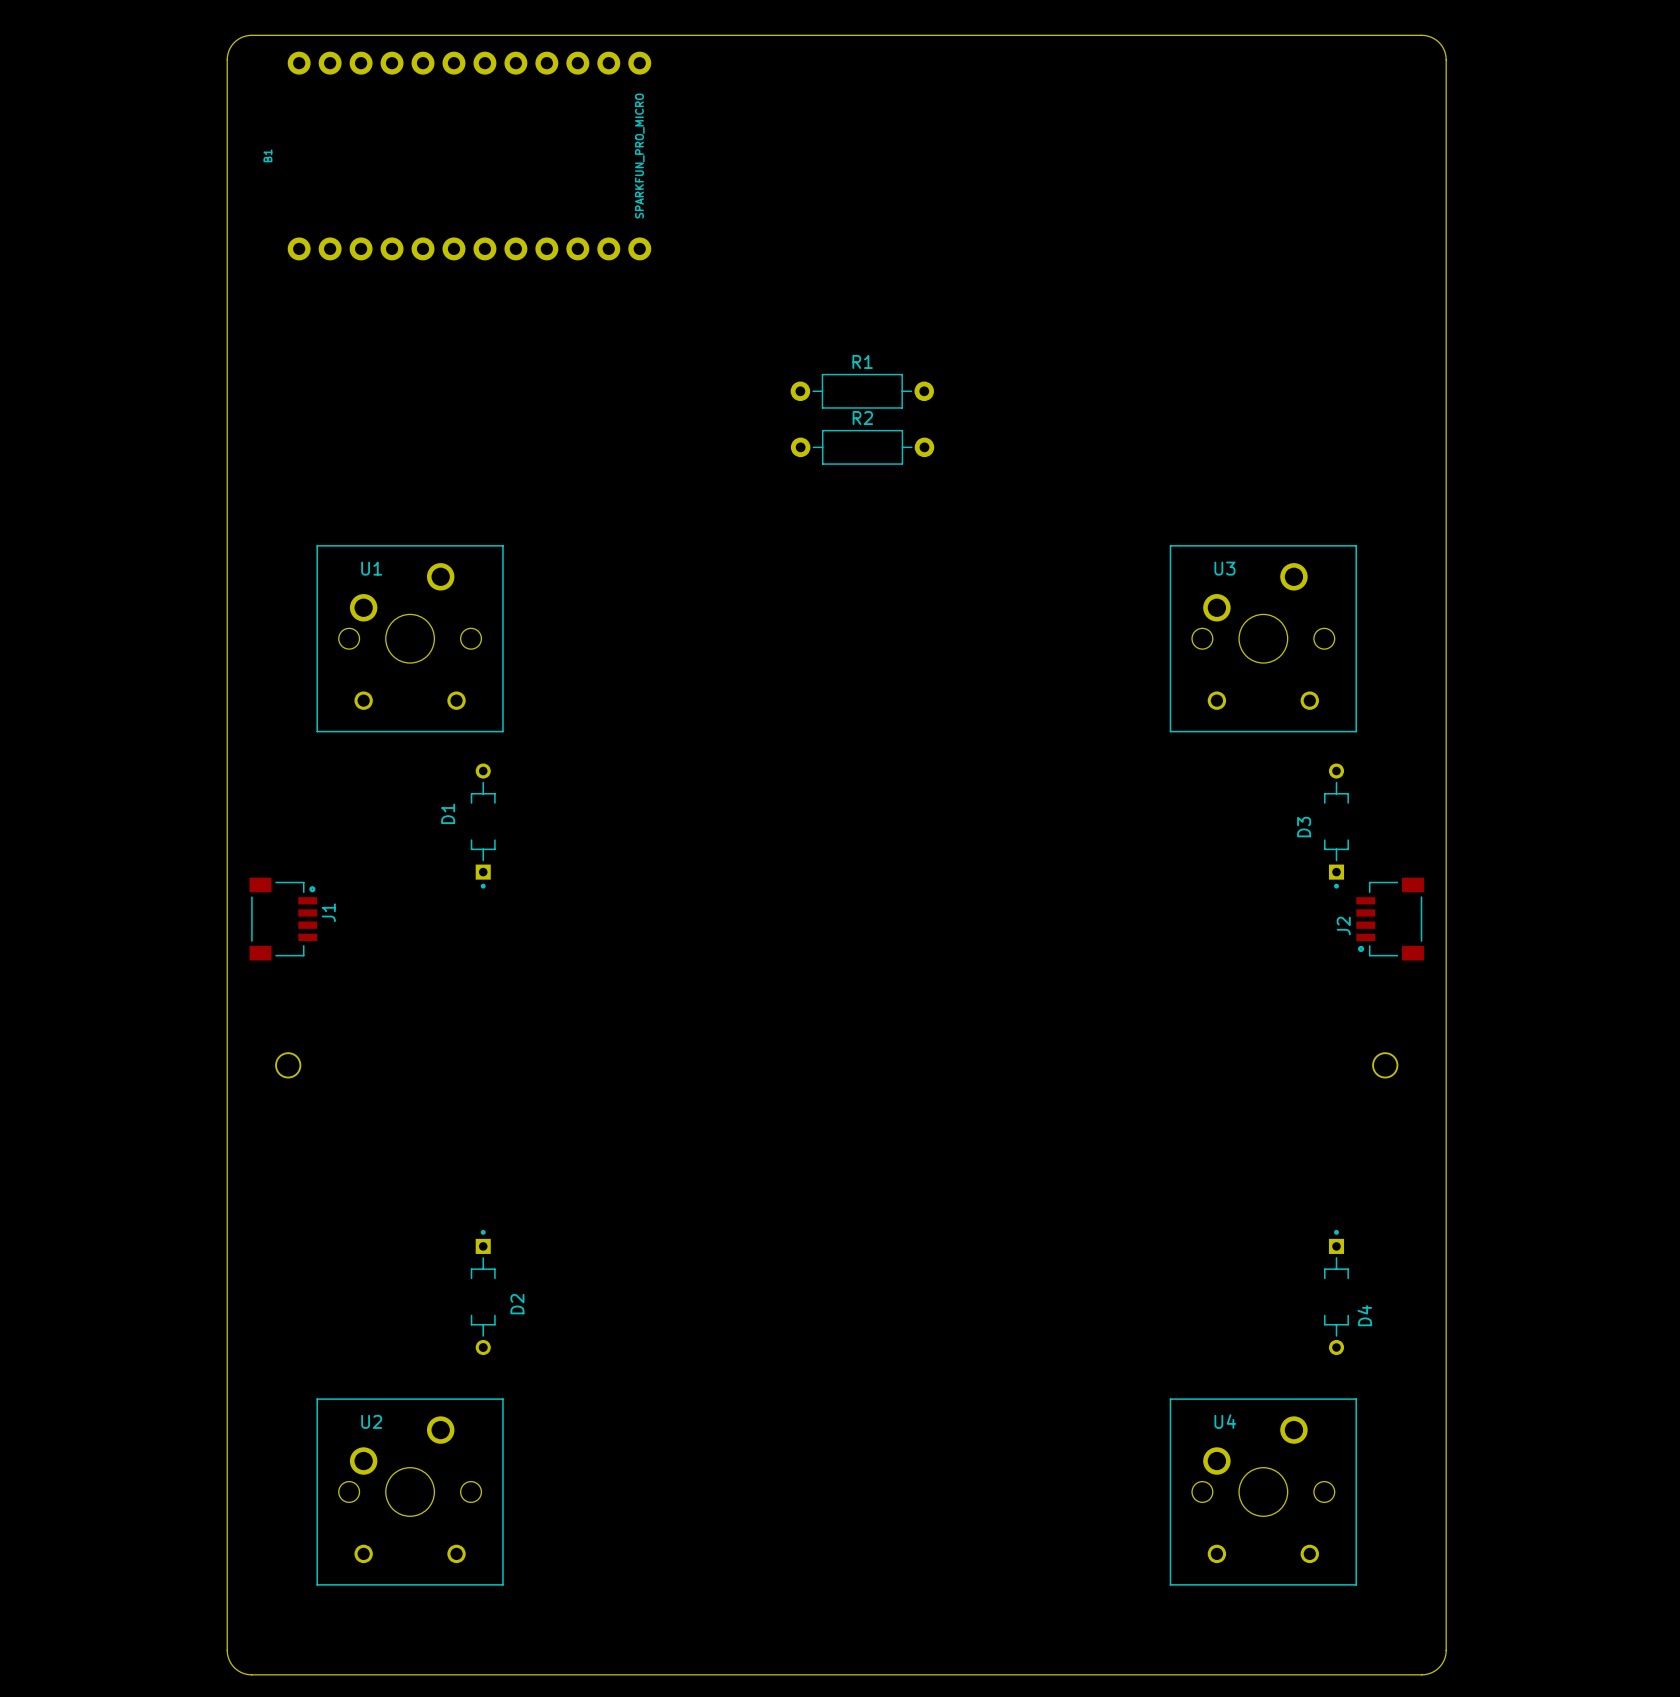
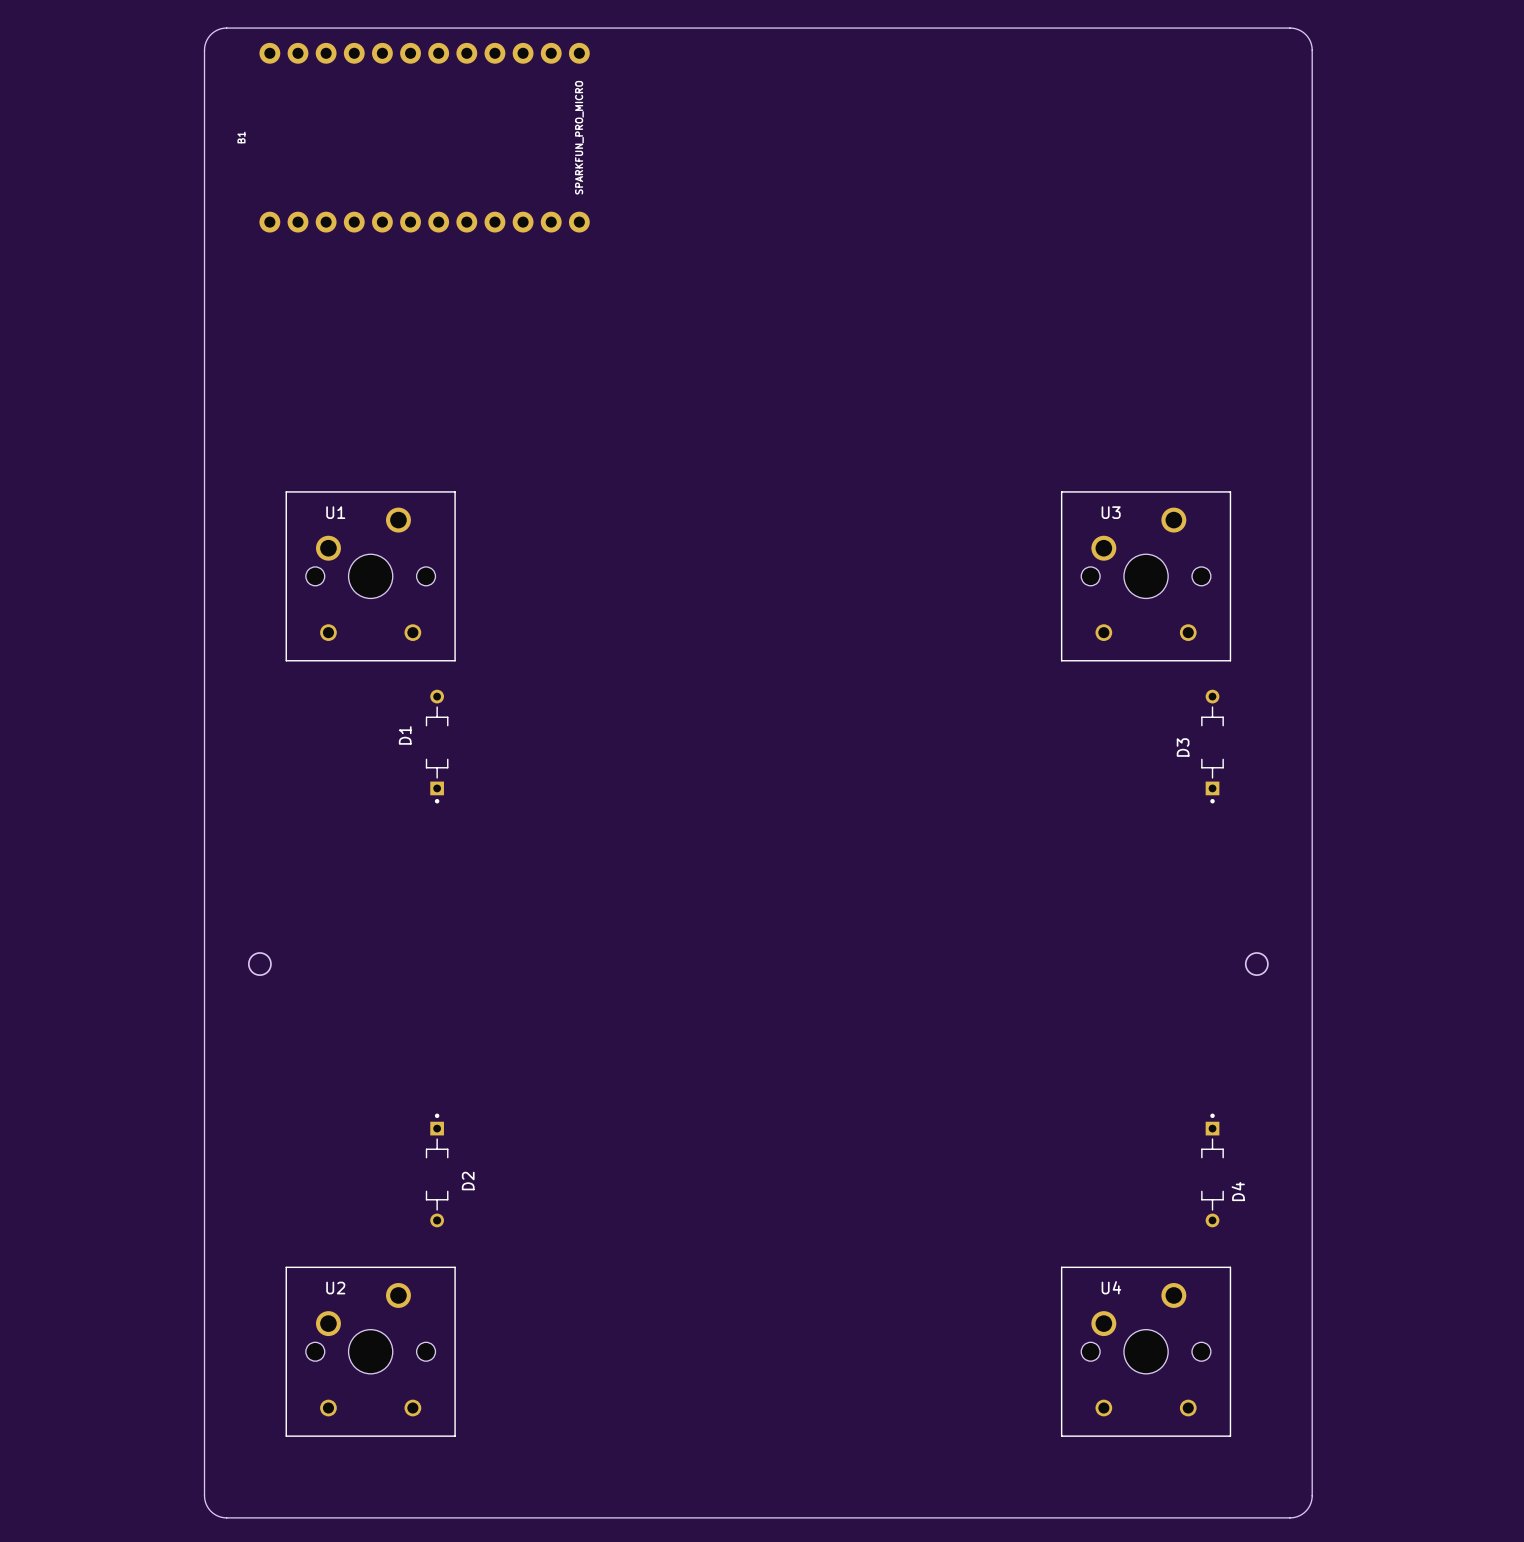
R1: (862, 391) -> none
R2: (862, 447) -> none
J1: (283, 919) -> none
J2: (1390, 919) -> none

